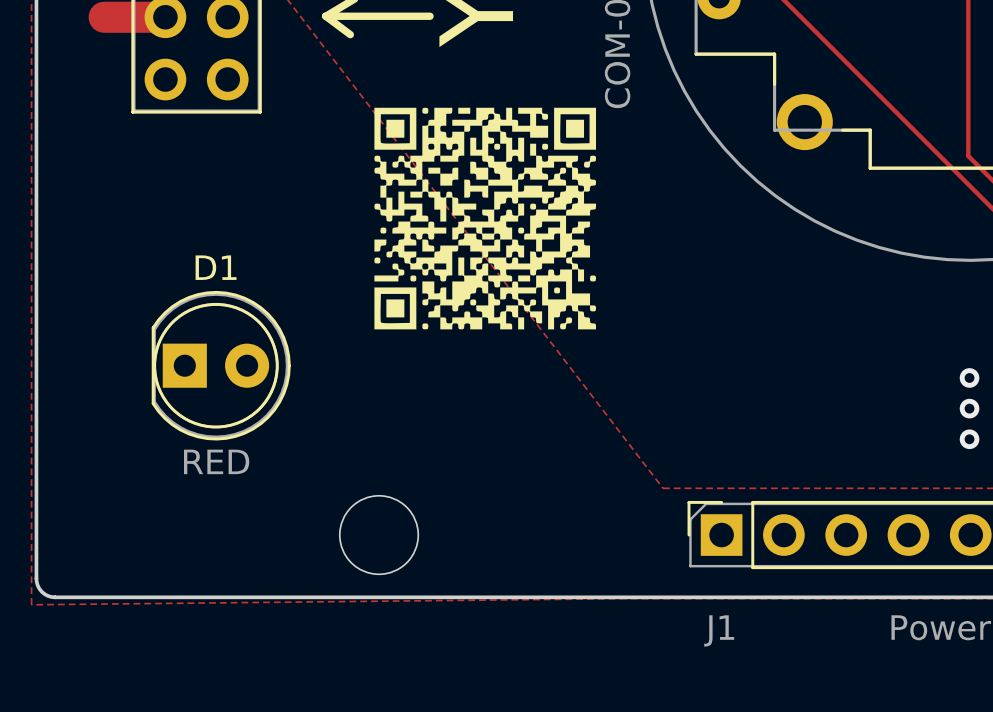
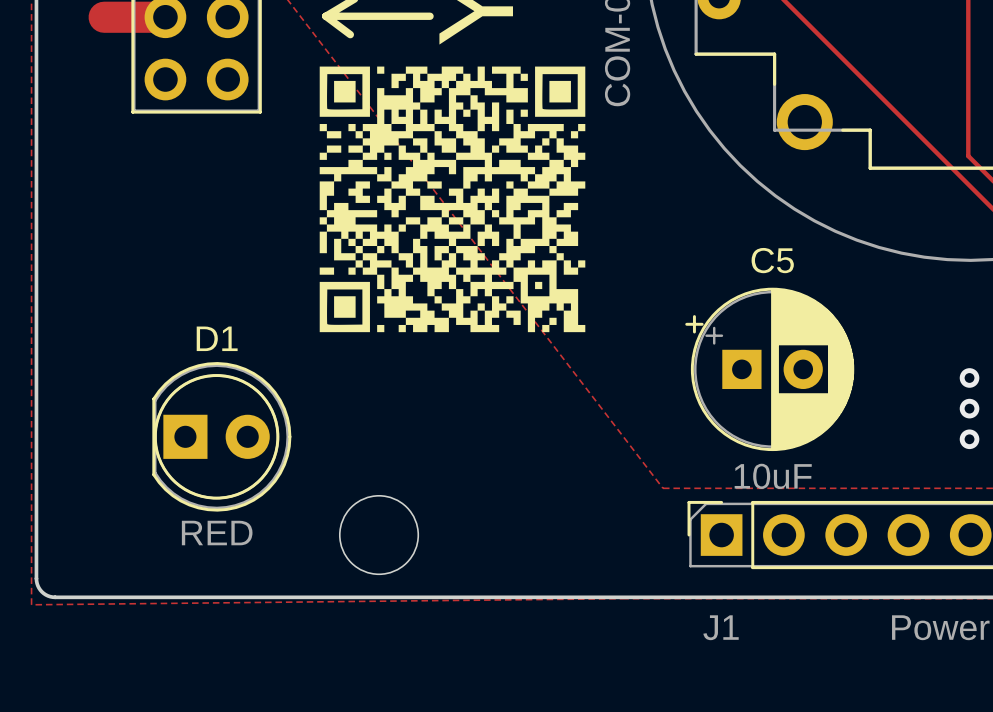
drawing: none -> [319, 66, 586, 333]
drawing: [374, 107, 597, 330] -> none
D1 position: (221, 365) -> (221, 436)
C5: none -> 10uF (769, 369)

